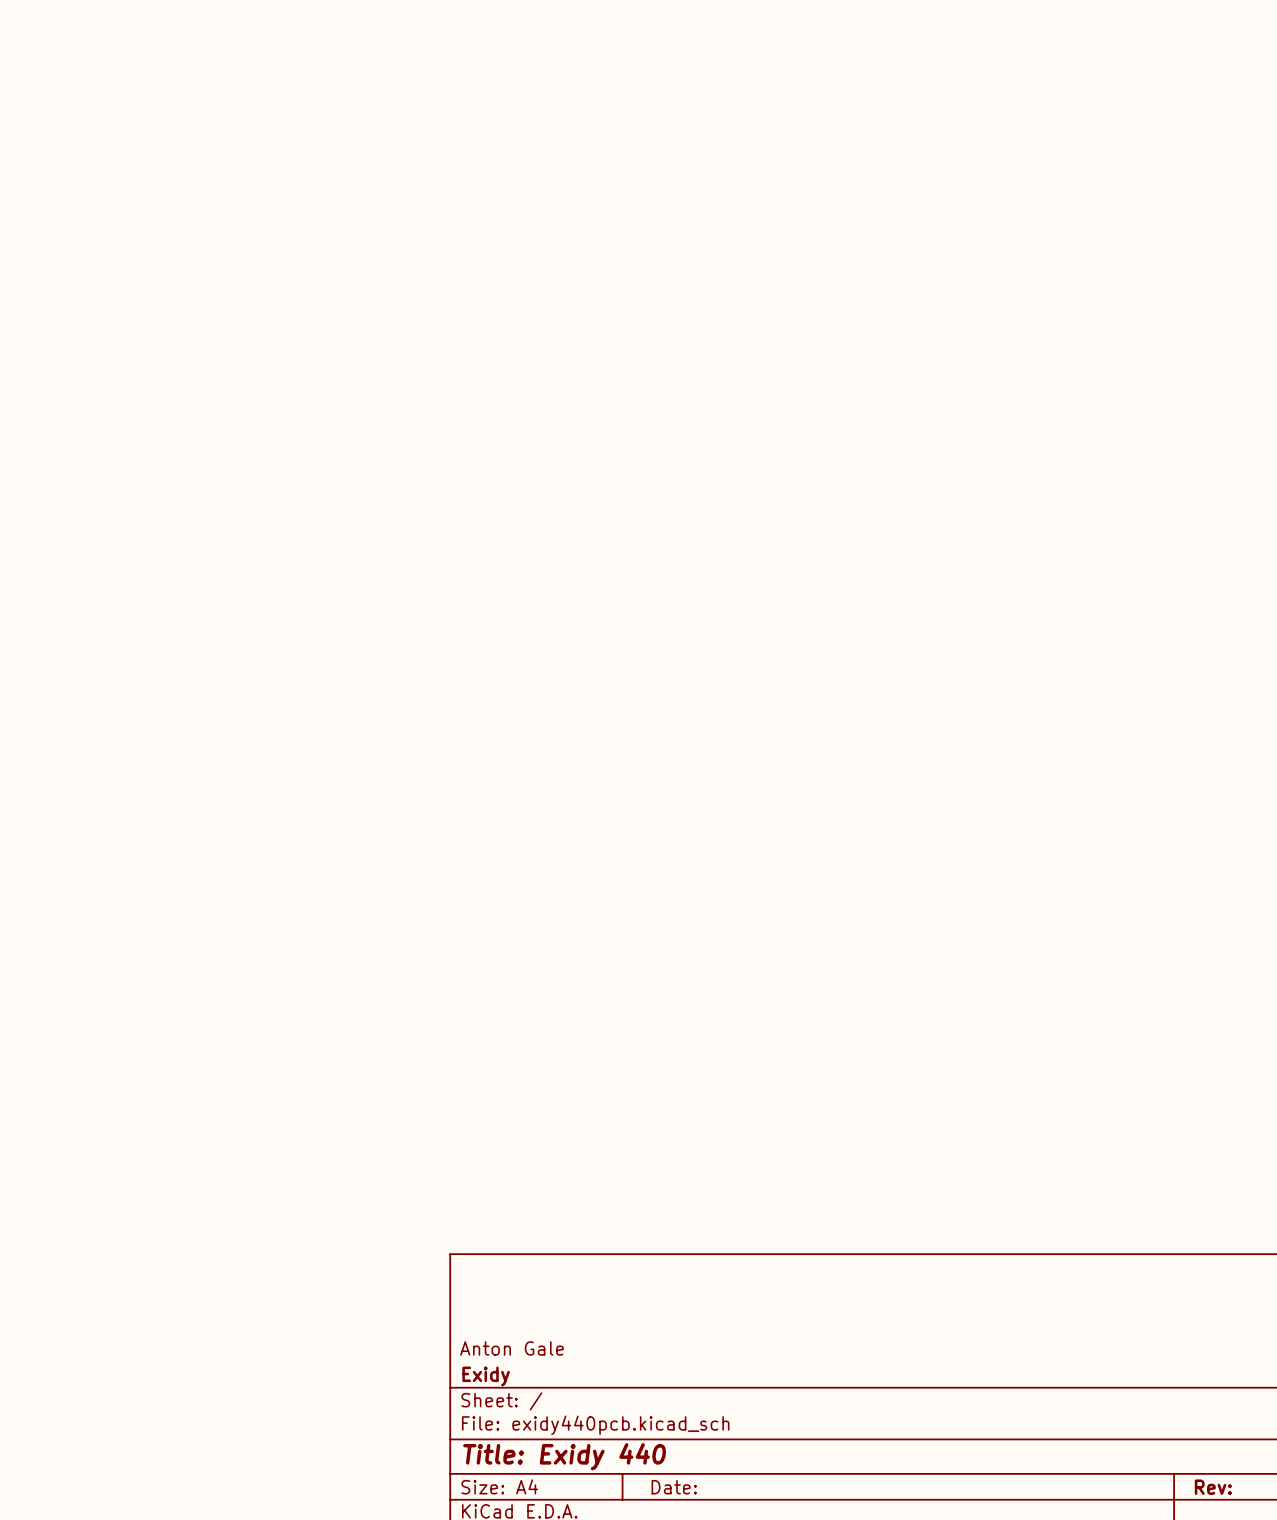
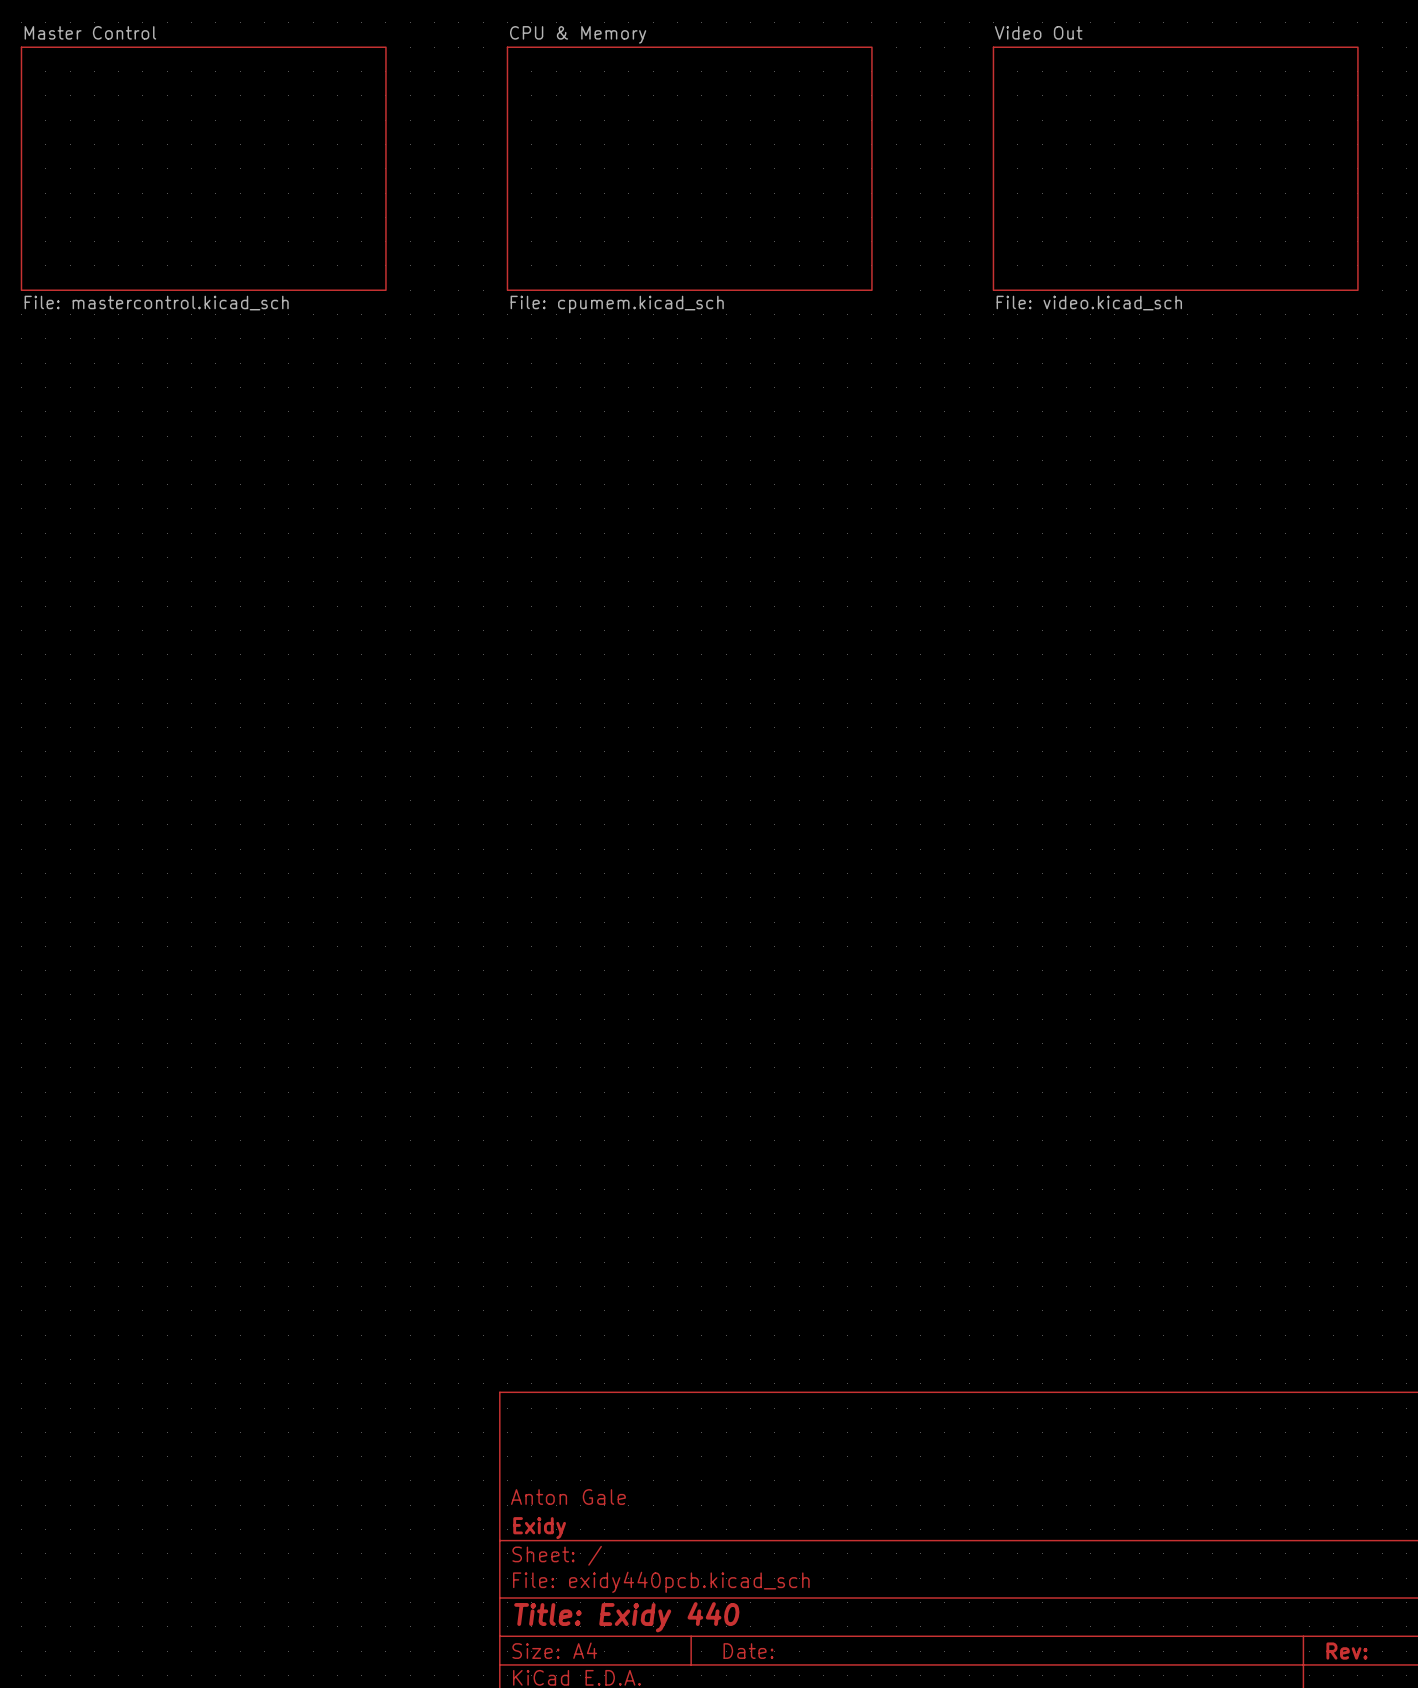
sheet Master Control: none -> File: mastercontrol.kicad_sch (203, 168)
sheet CPU & Memory: none -> File: cpumem.kicad_sch (689, 168)
sheet Video Out: none -> File: video.kicad_sch (1175, 168)

